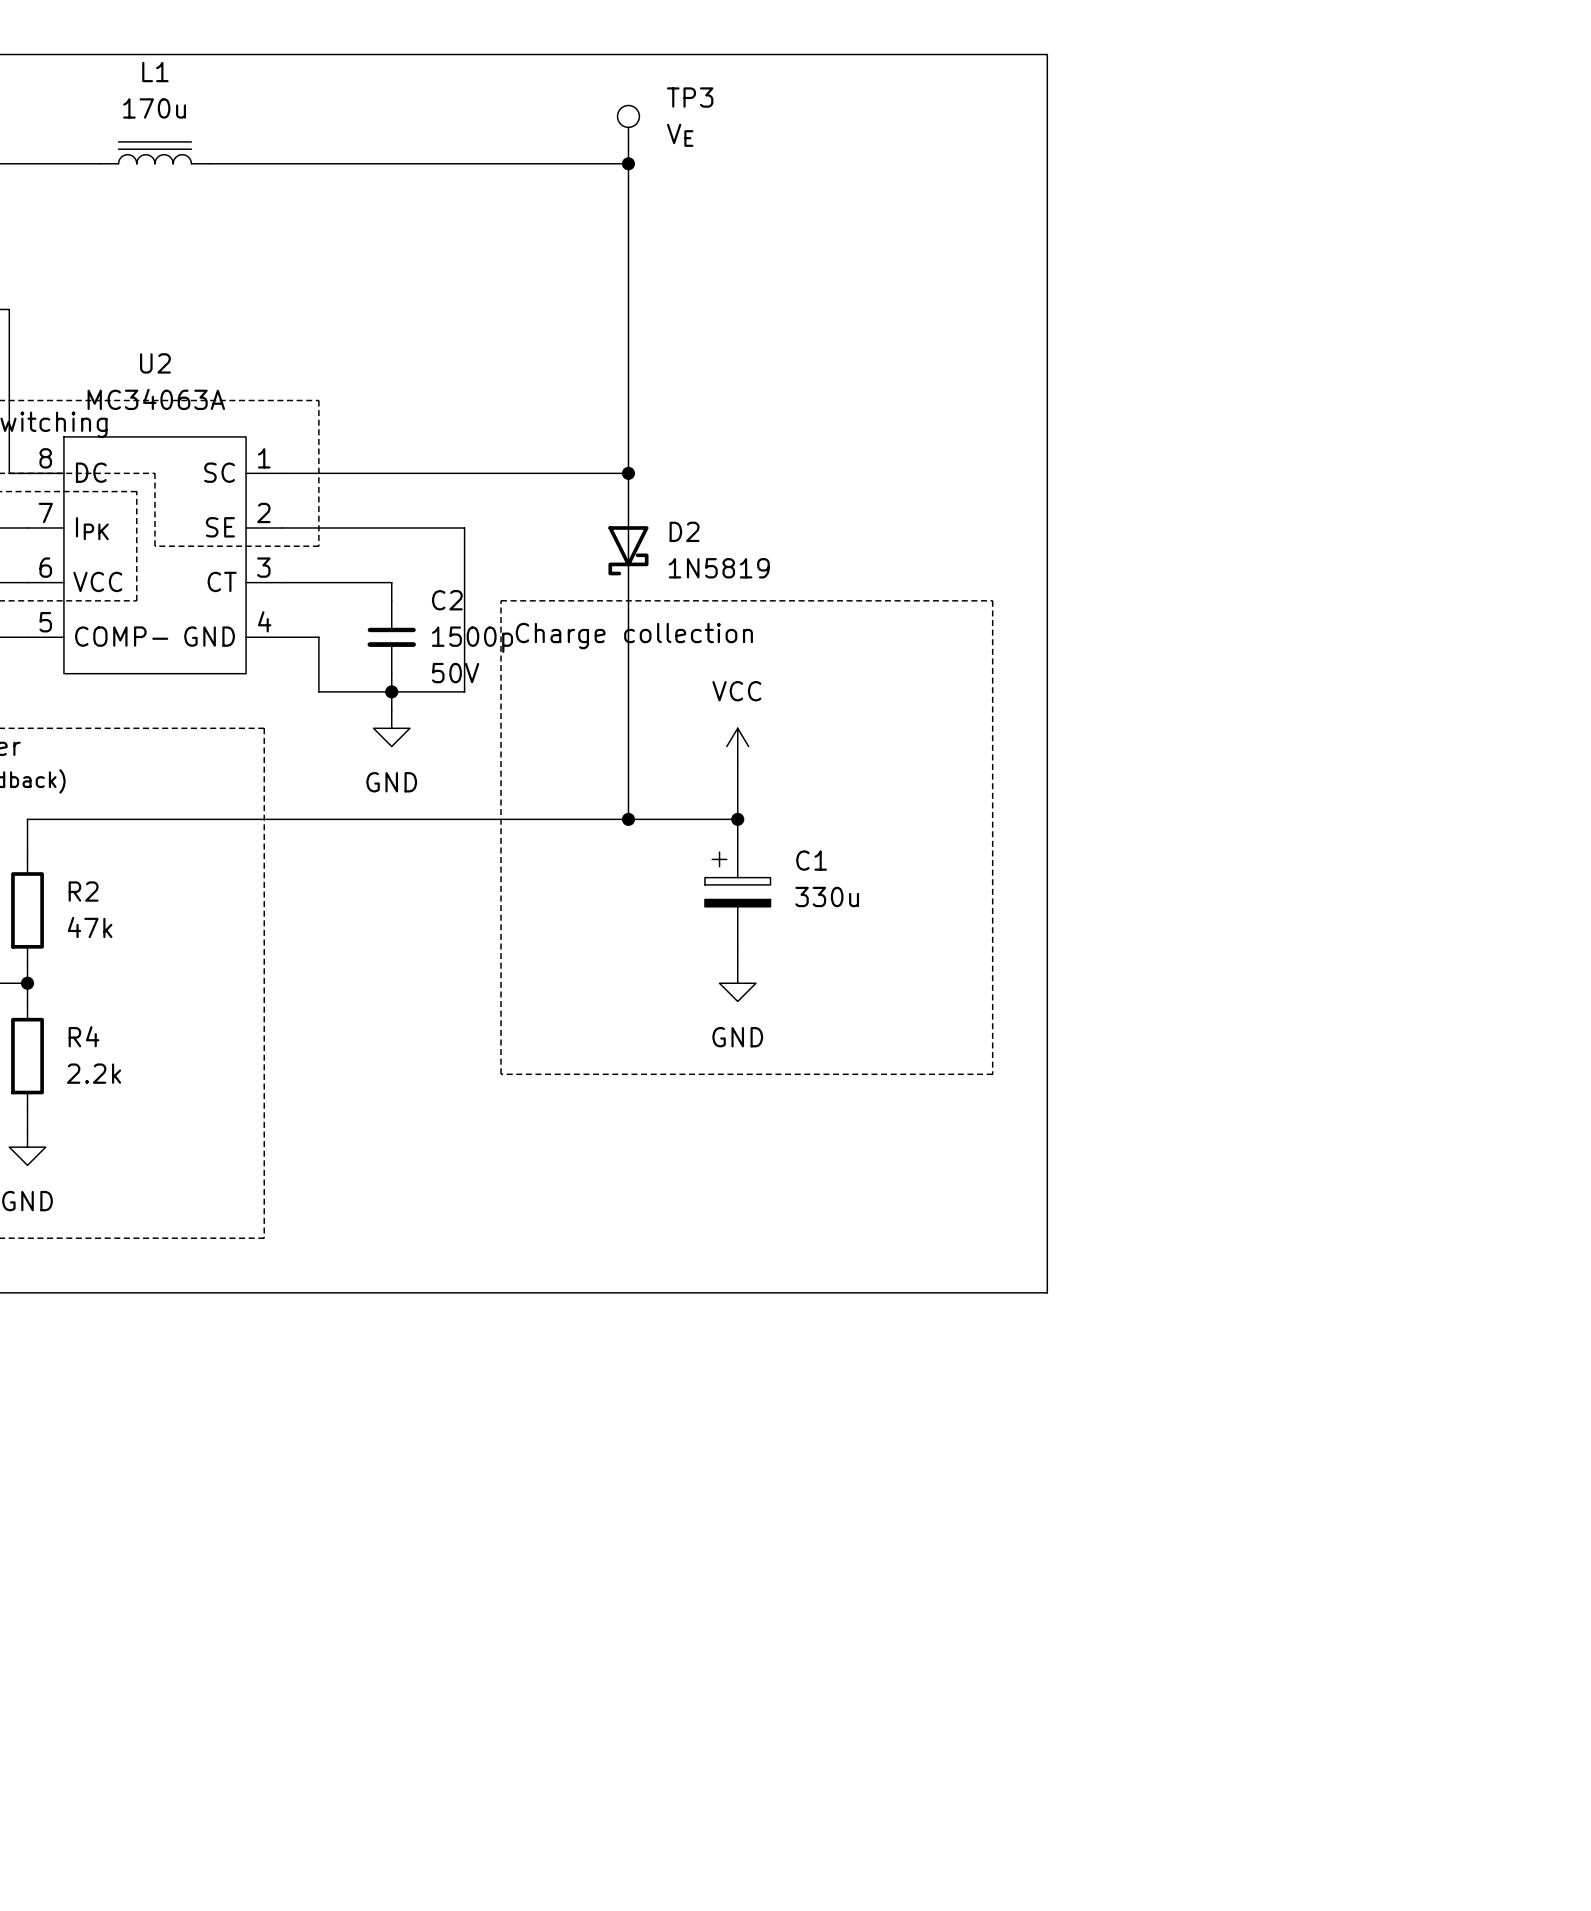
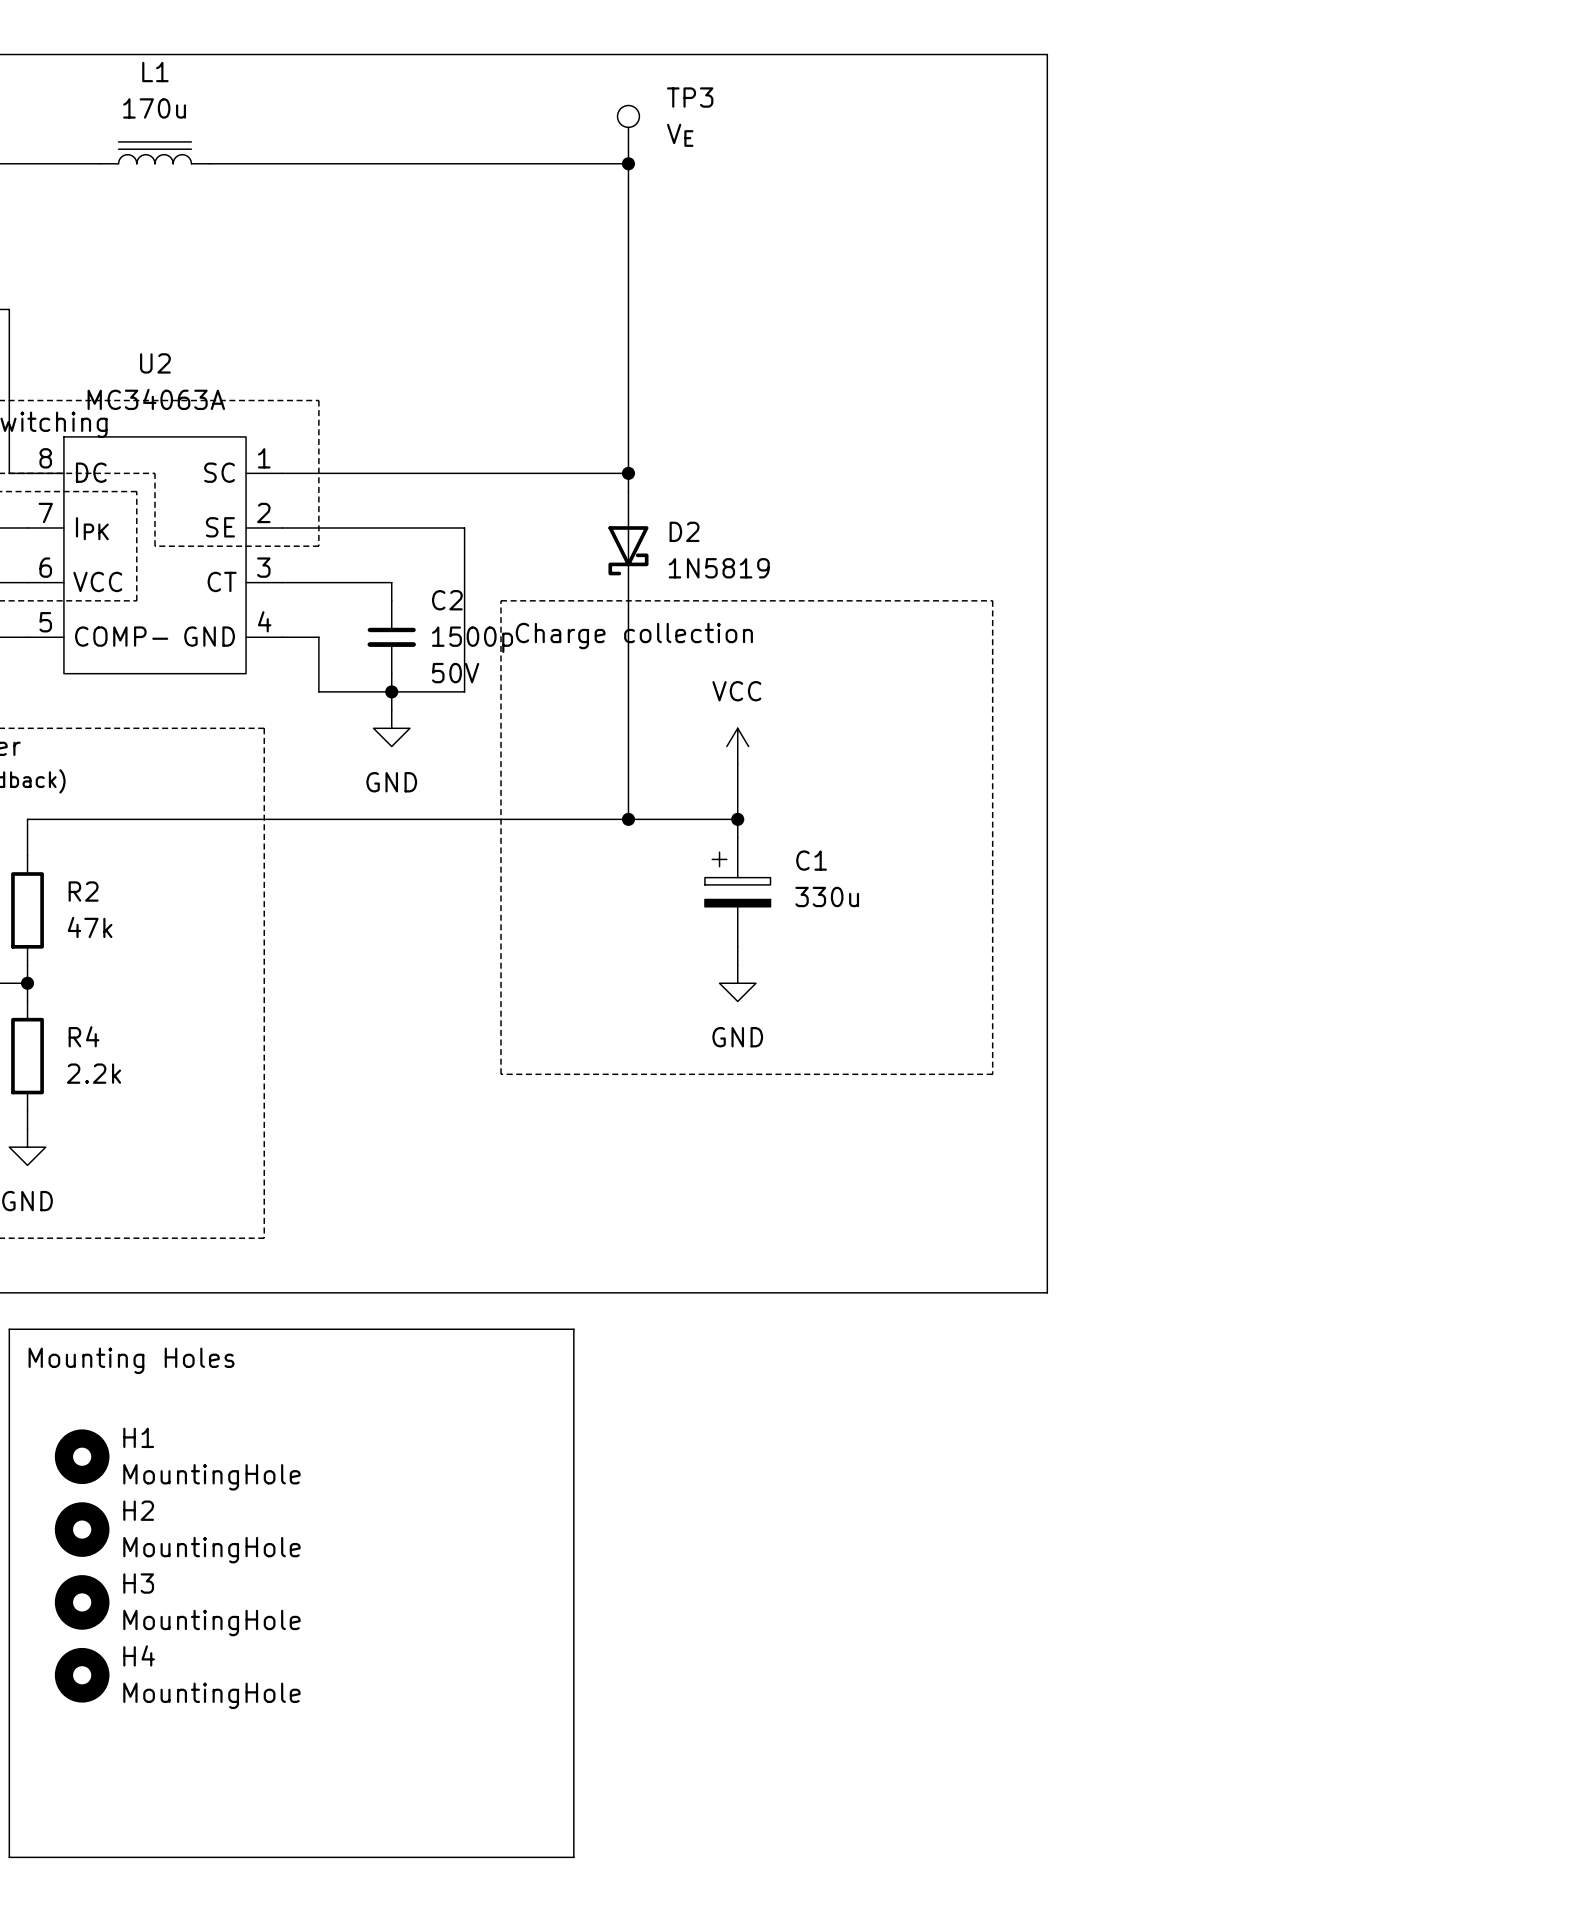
line: none -> (9, 1329) (573, 1329) (573, 1857) (9, 1857) (9, 1329)
text: none -> Mounting Holes (131, 1360)
H1: none -> MountingHole (82, 1456)
H2: none -> MountingHole (82, 1529)
H3: none -> MountingHole (82, 1602)
H4: none -> MountingHole (82, 1675)

